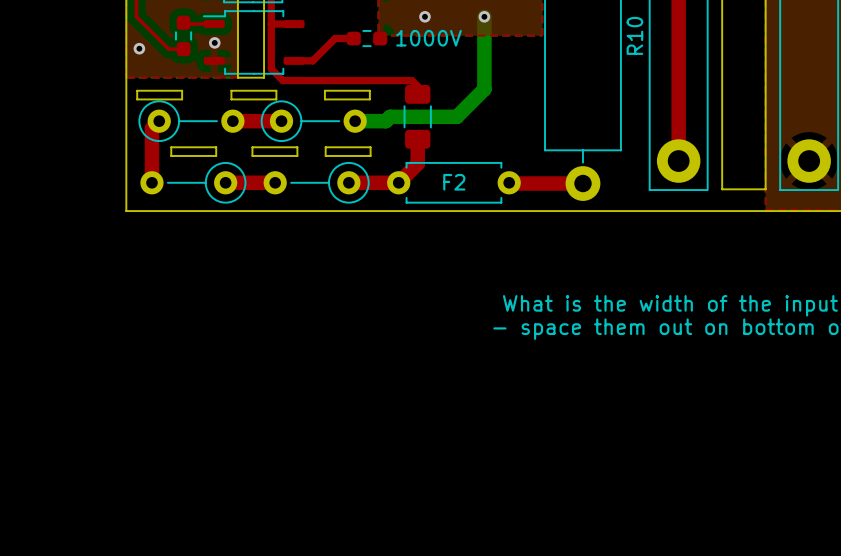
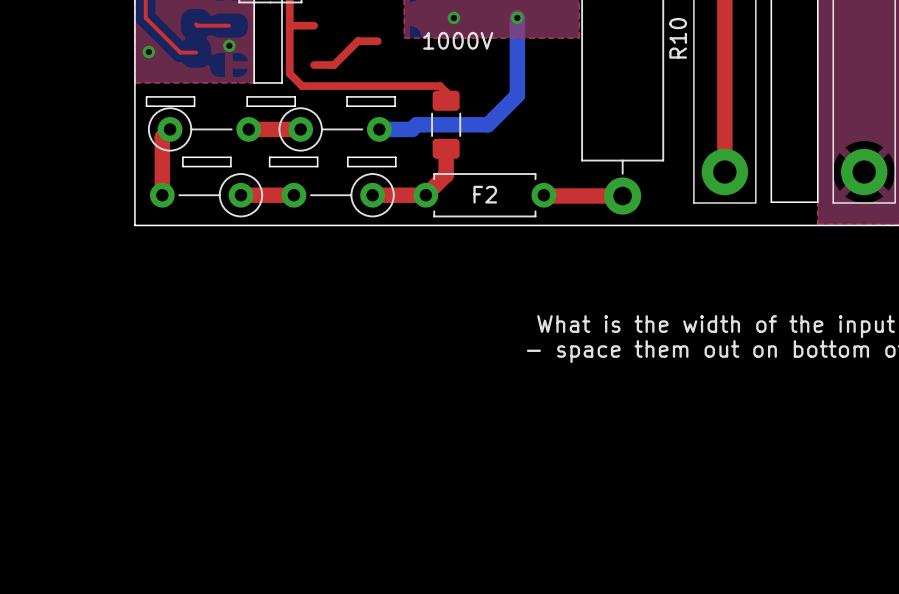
part: (183, 35) -> none
part: (366, 38) -> none
part: (253, 42) -> none

